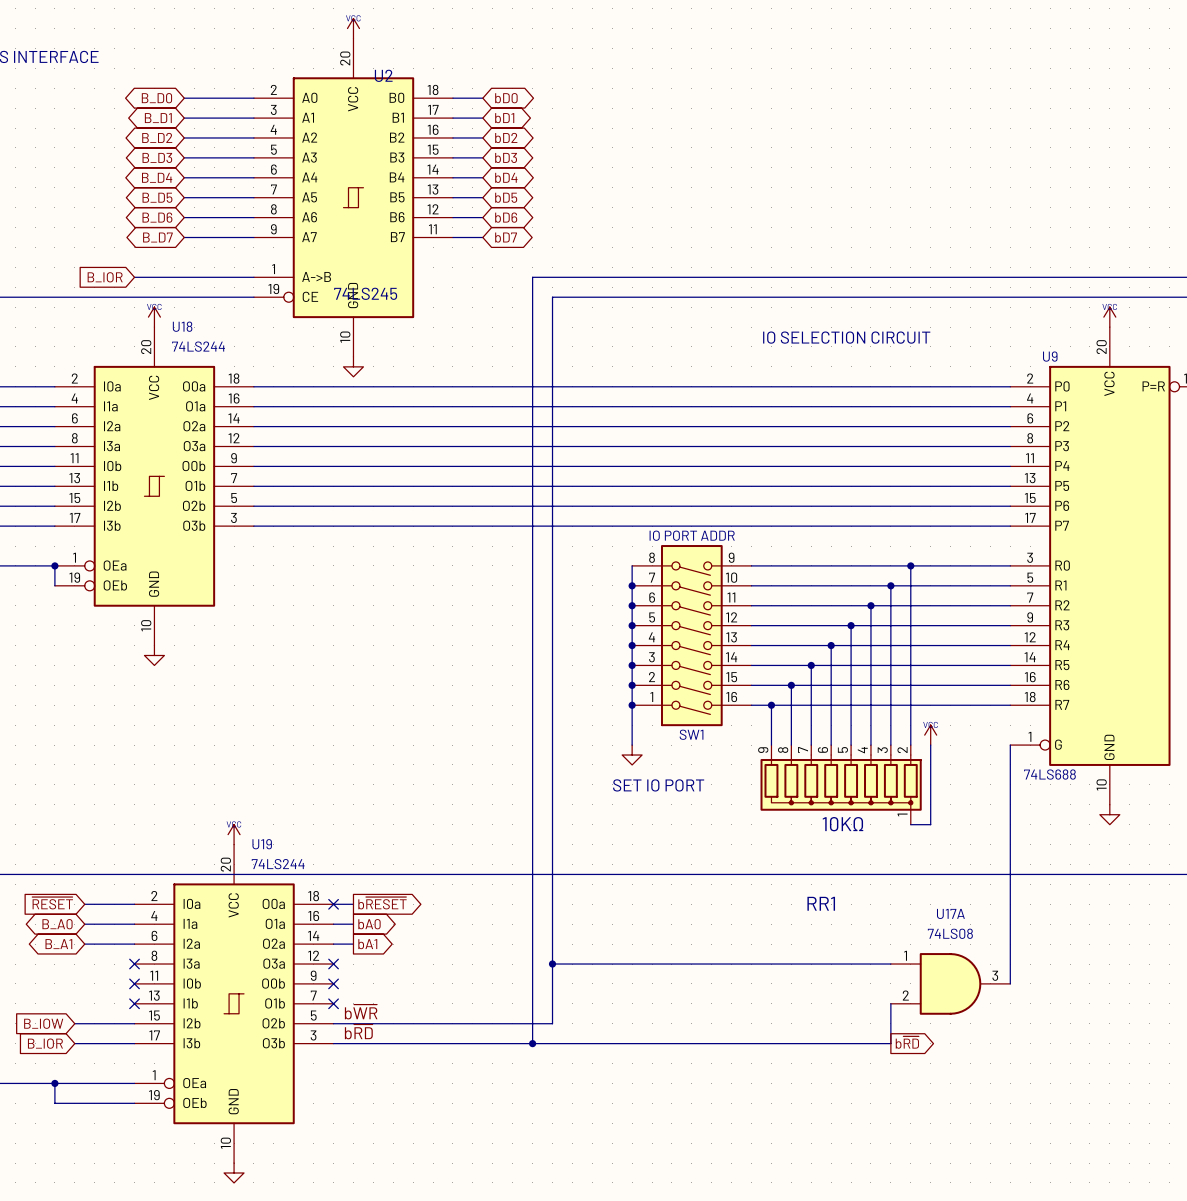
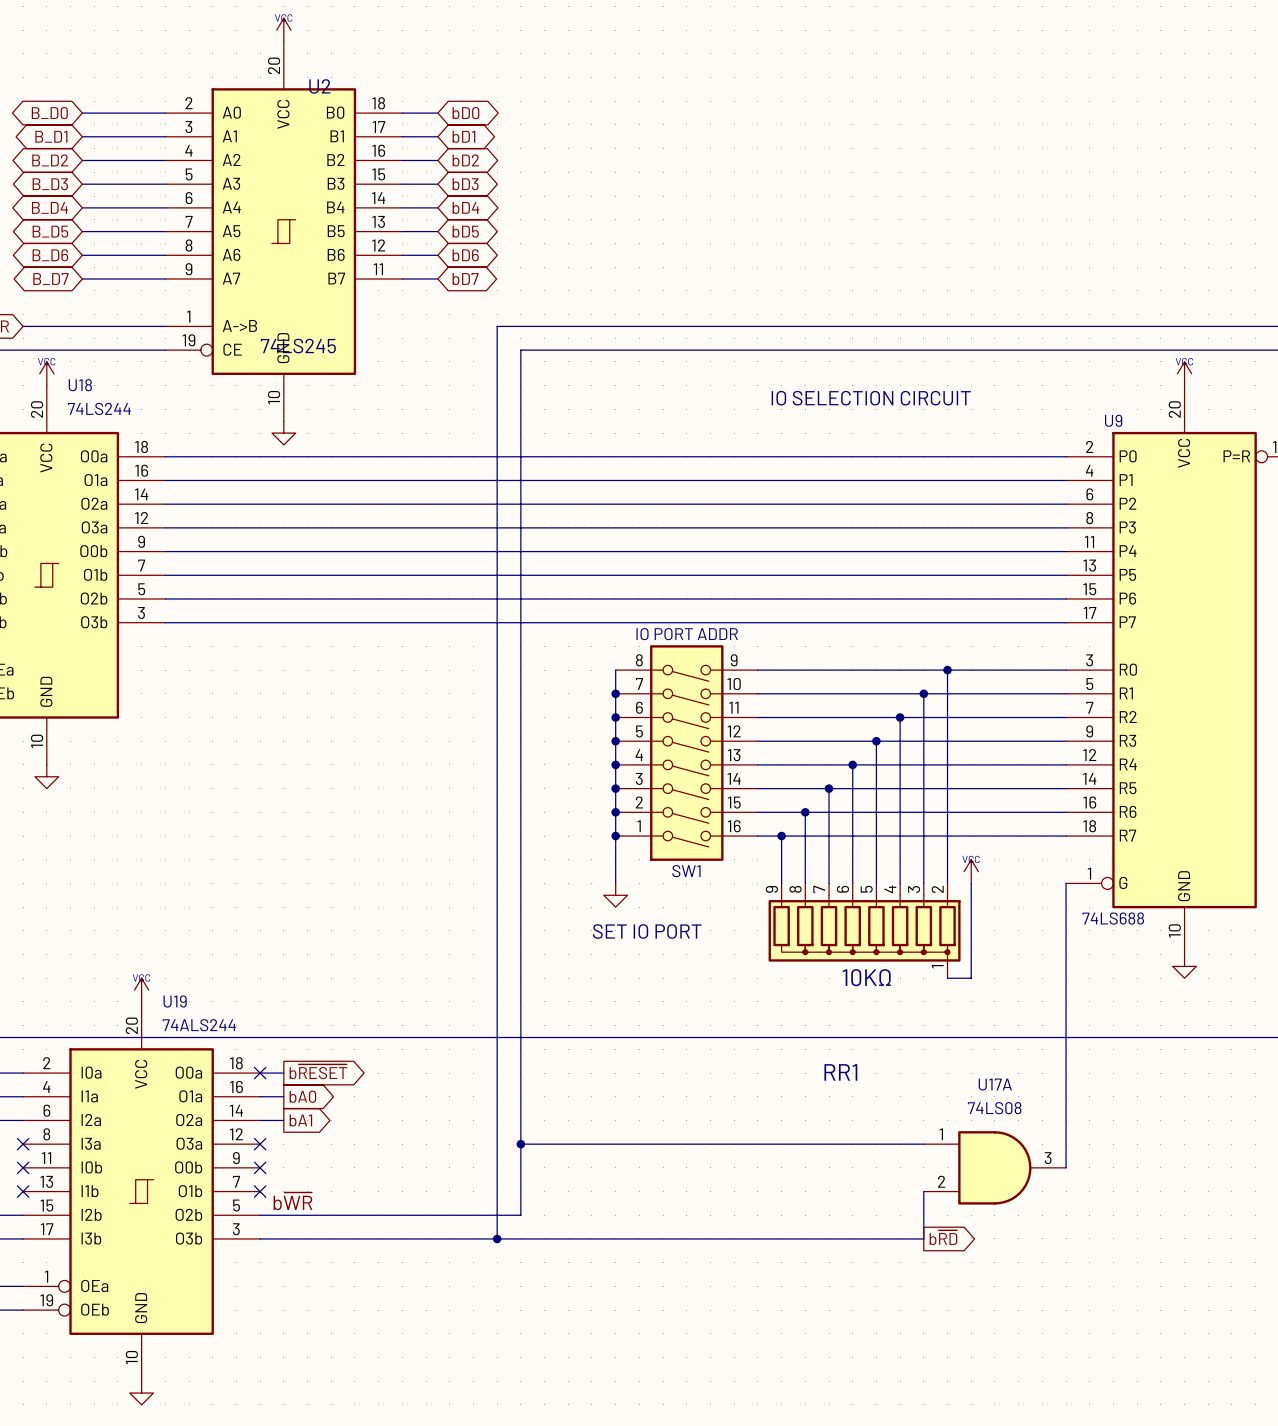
U19 value: 74LS244 (278, 864) -> 74ALS244 (199, 1025)
label: b~{RD} (358, 1031) -> none

